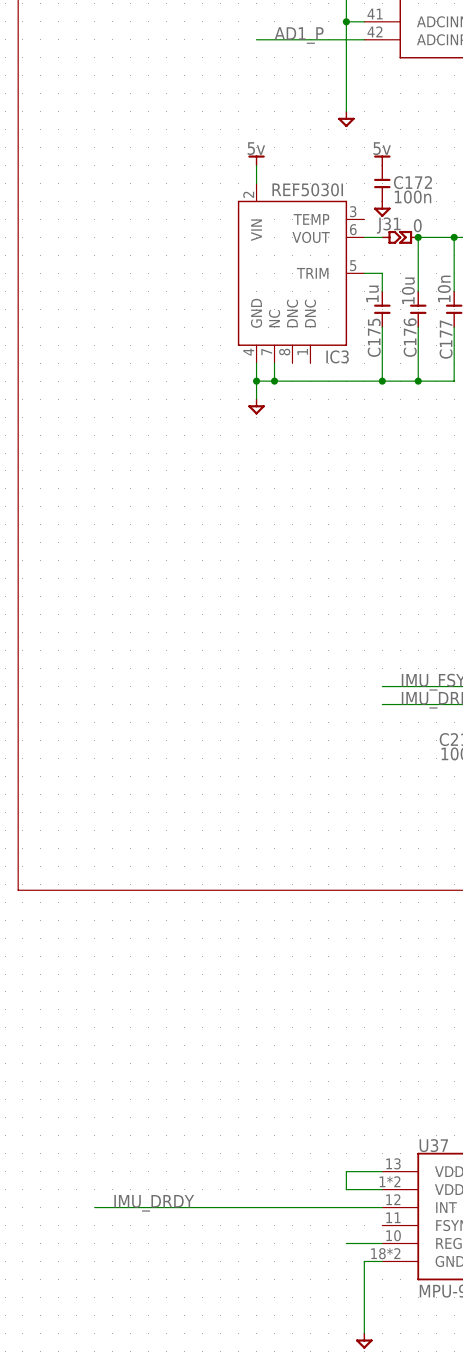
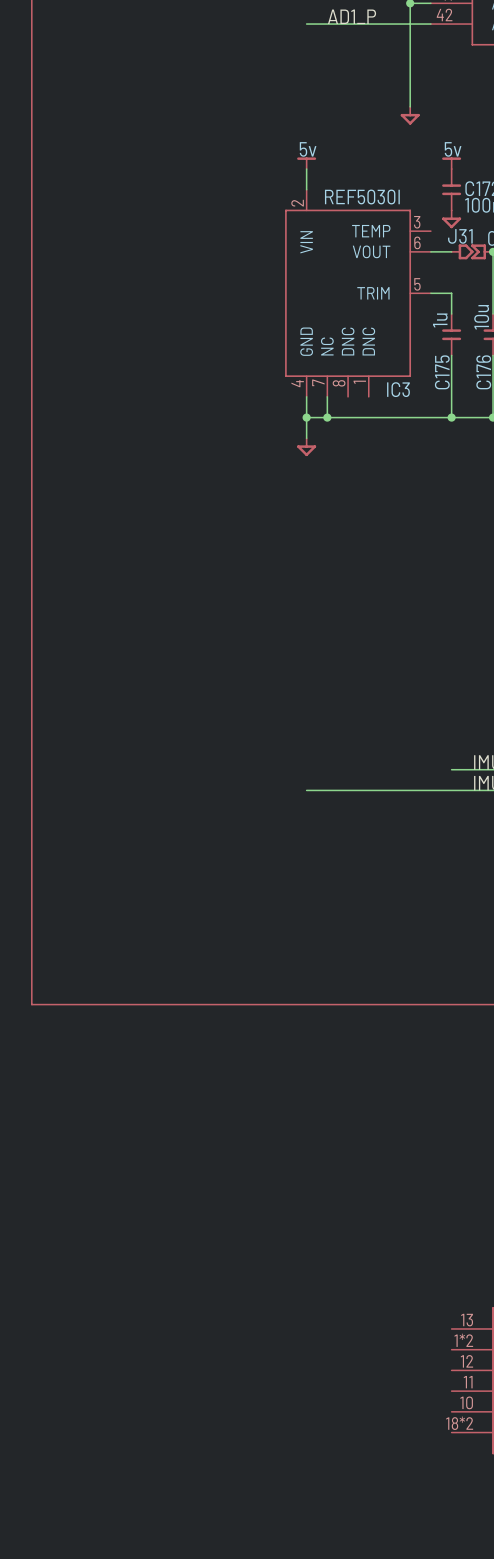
wire: none -> (306, 790) (451, 790)
wire: (382, 1171) (346, 1171) (346, 1189) (382, 1189) -> none
label: IMU_DRDY (154, 1203) -> none
wire: (94, 1207) (382, 1207) -> none
wire: (346, 1243) (382, 1243) -> none
wire: (382, 1261) (364, 1261) (364, 1333) -> none
power symbol: (364, 1340) -> none

